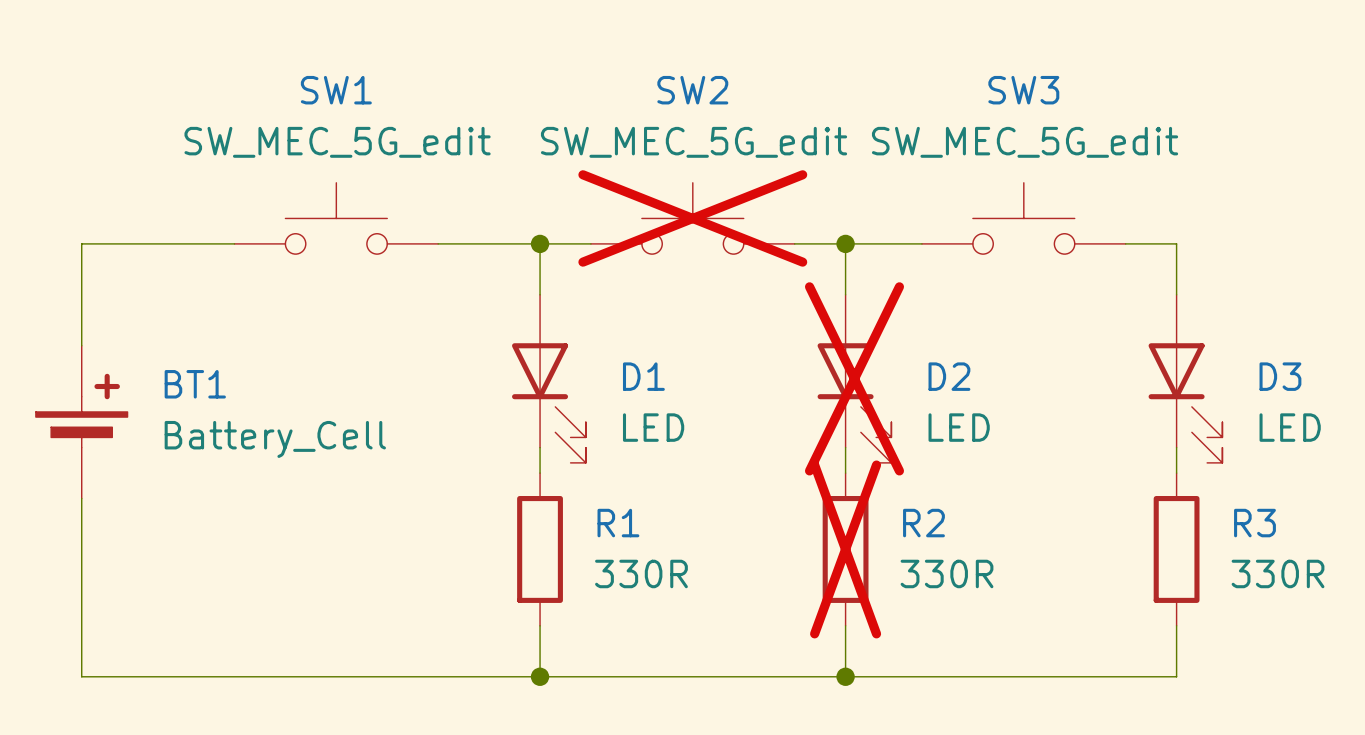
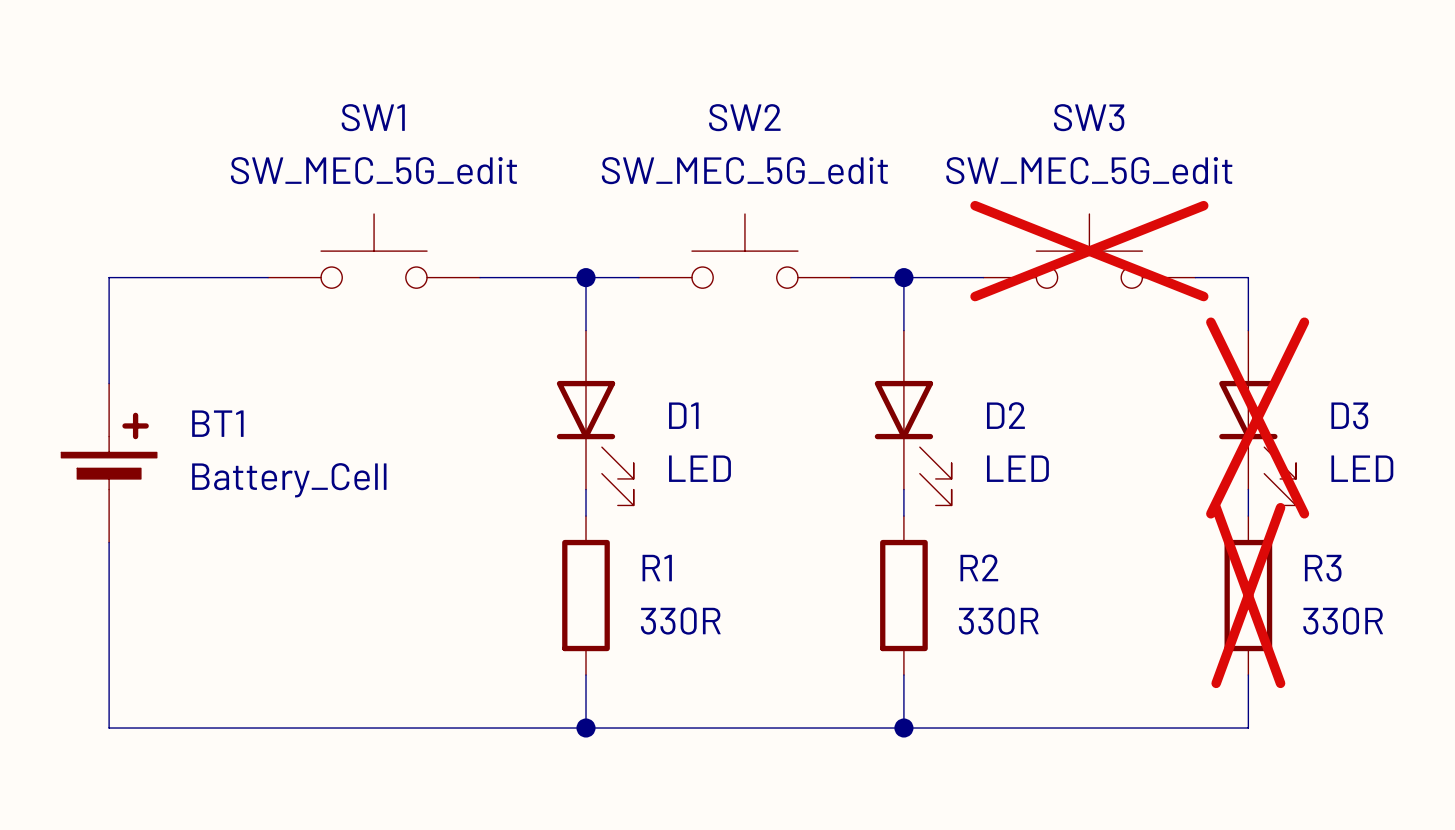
SW2 do-not-place cross: (692, 218) -> none
SW3 do-not-place cross: none -> (1089, 251)
D2 do-not-place cross: (854, 378) -> none
D3 do-not-place cross: none -> (1257, 418)
R2 do-not-place cross: (845, 549) -> none
R3 do-not-place cross: none -> (1248, 595)

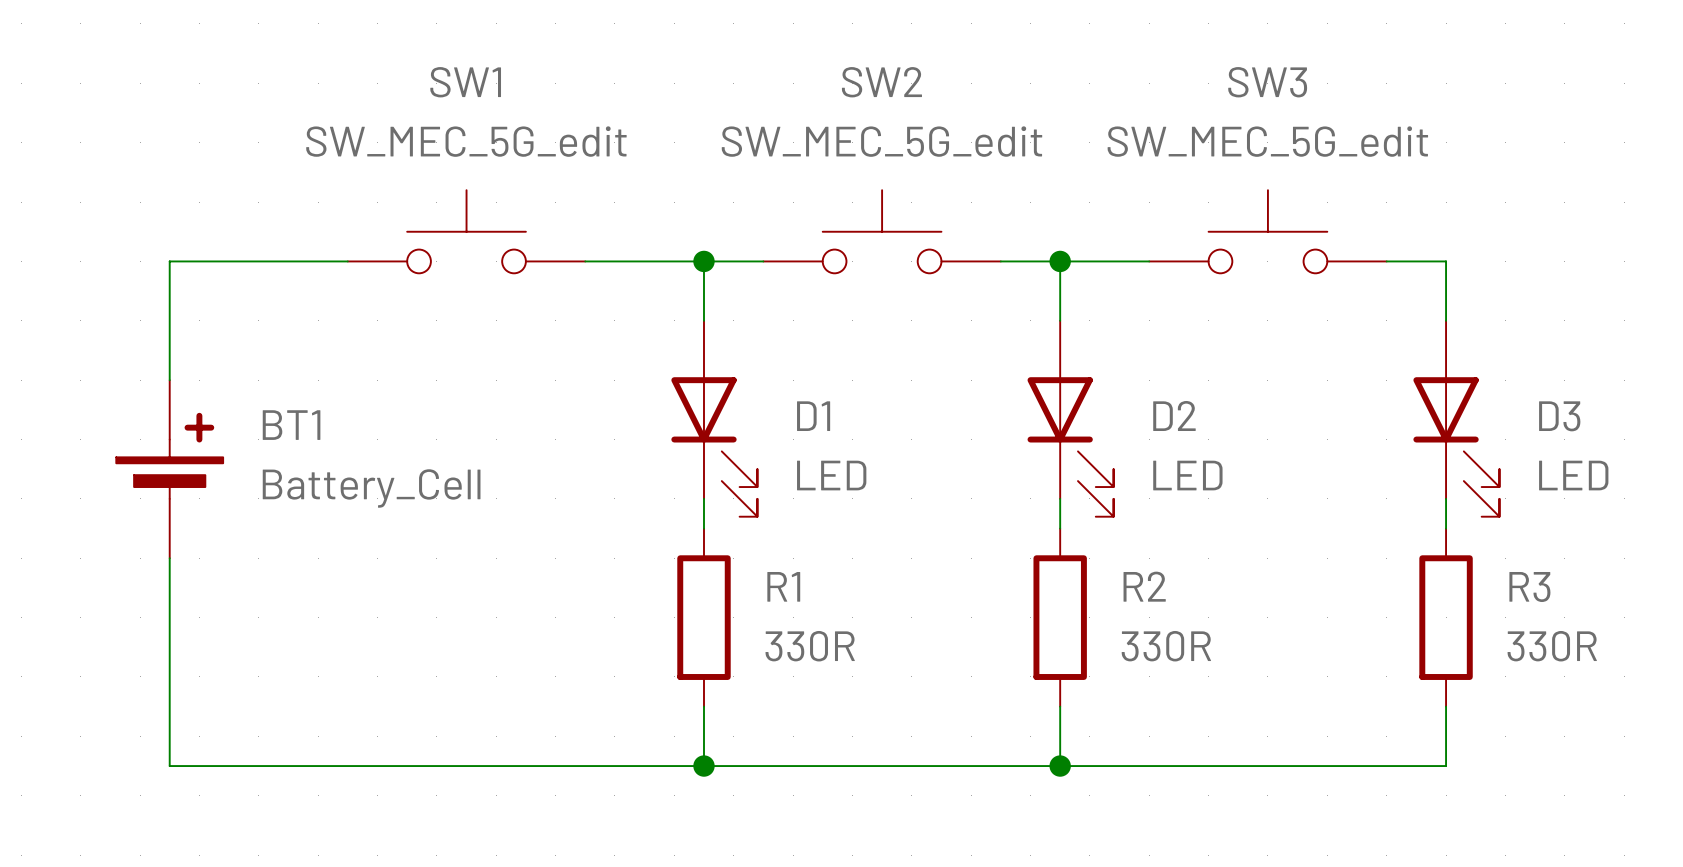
SW3 do-not-place cross: (1089, 251) -> none
D3 do-not-place cross: (1257, 418) -> none
R3 do-not-place cross: (1248, 595) -> none

